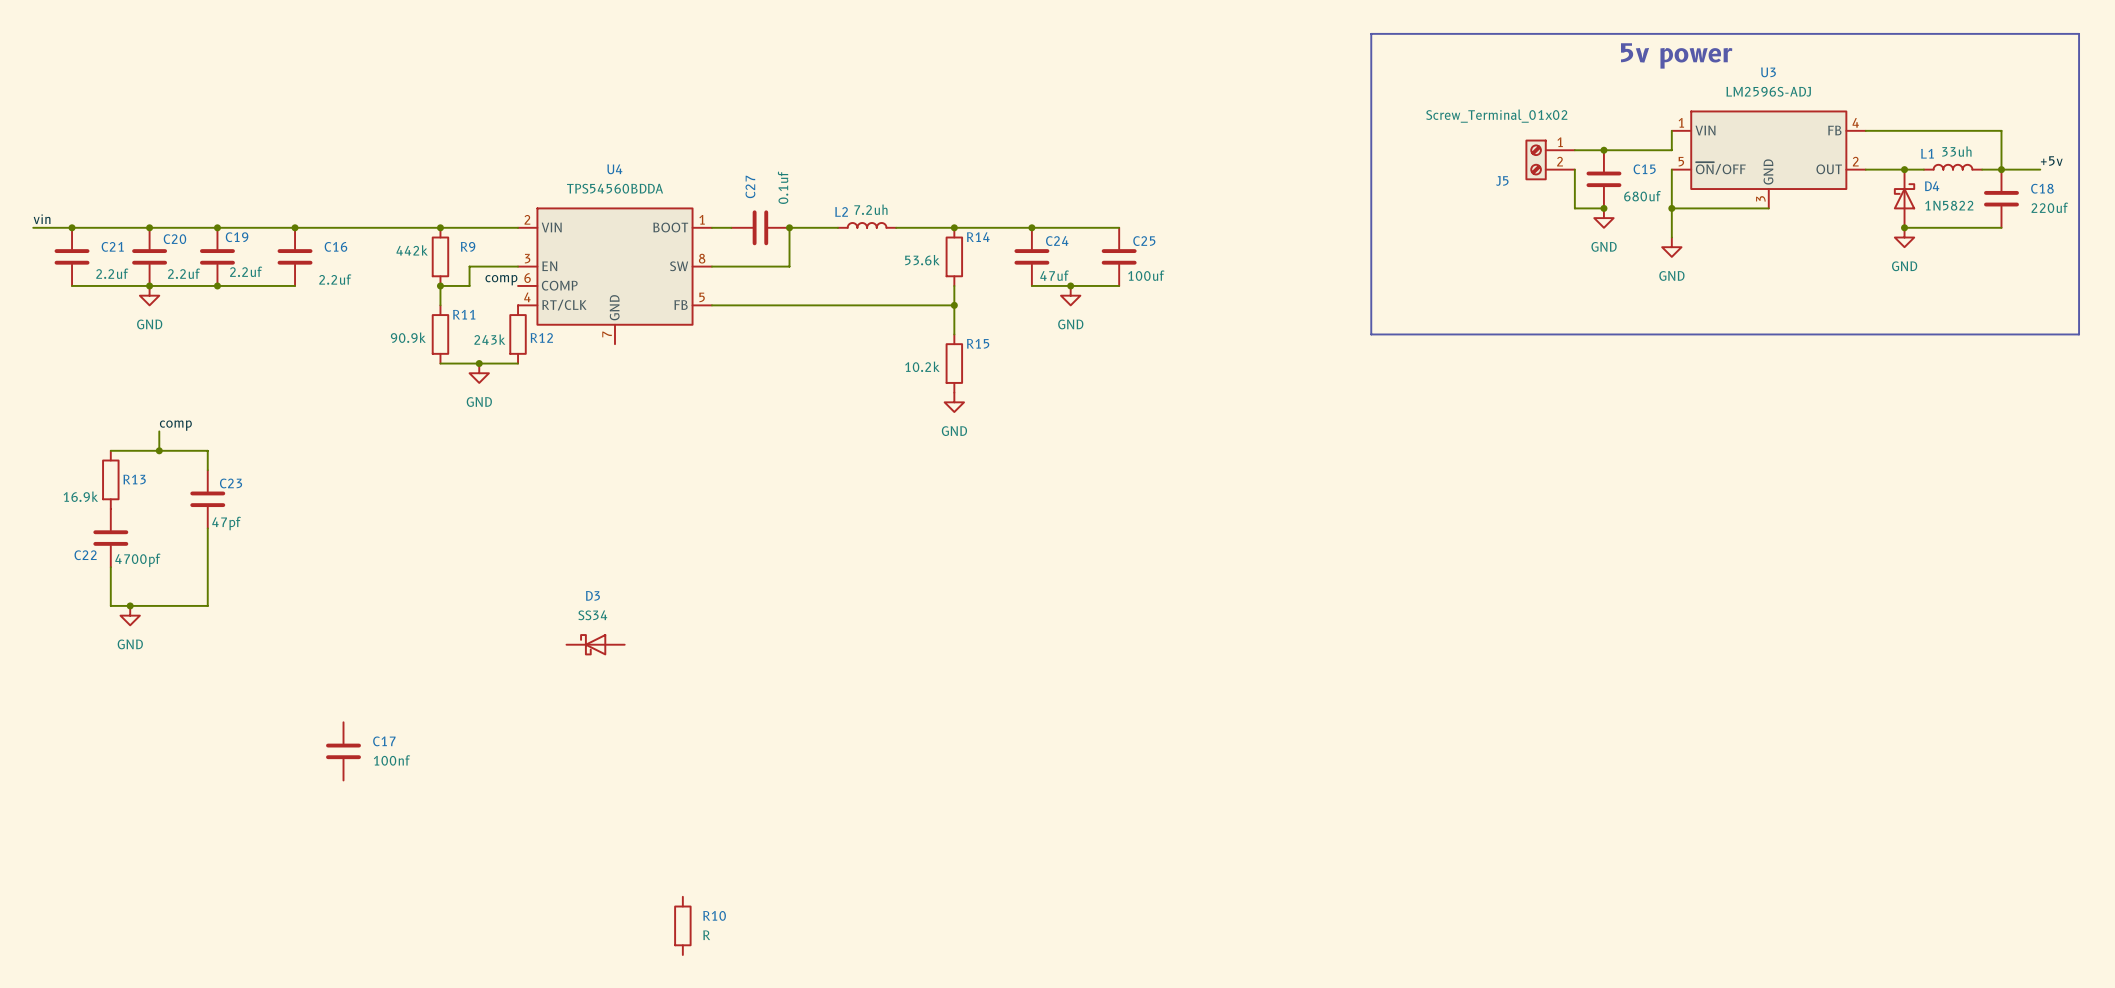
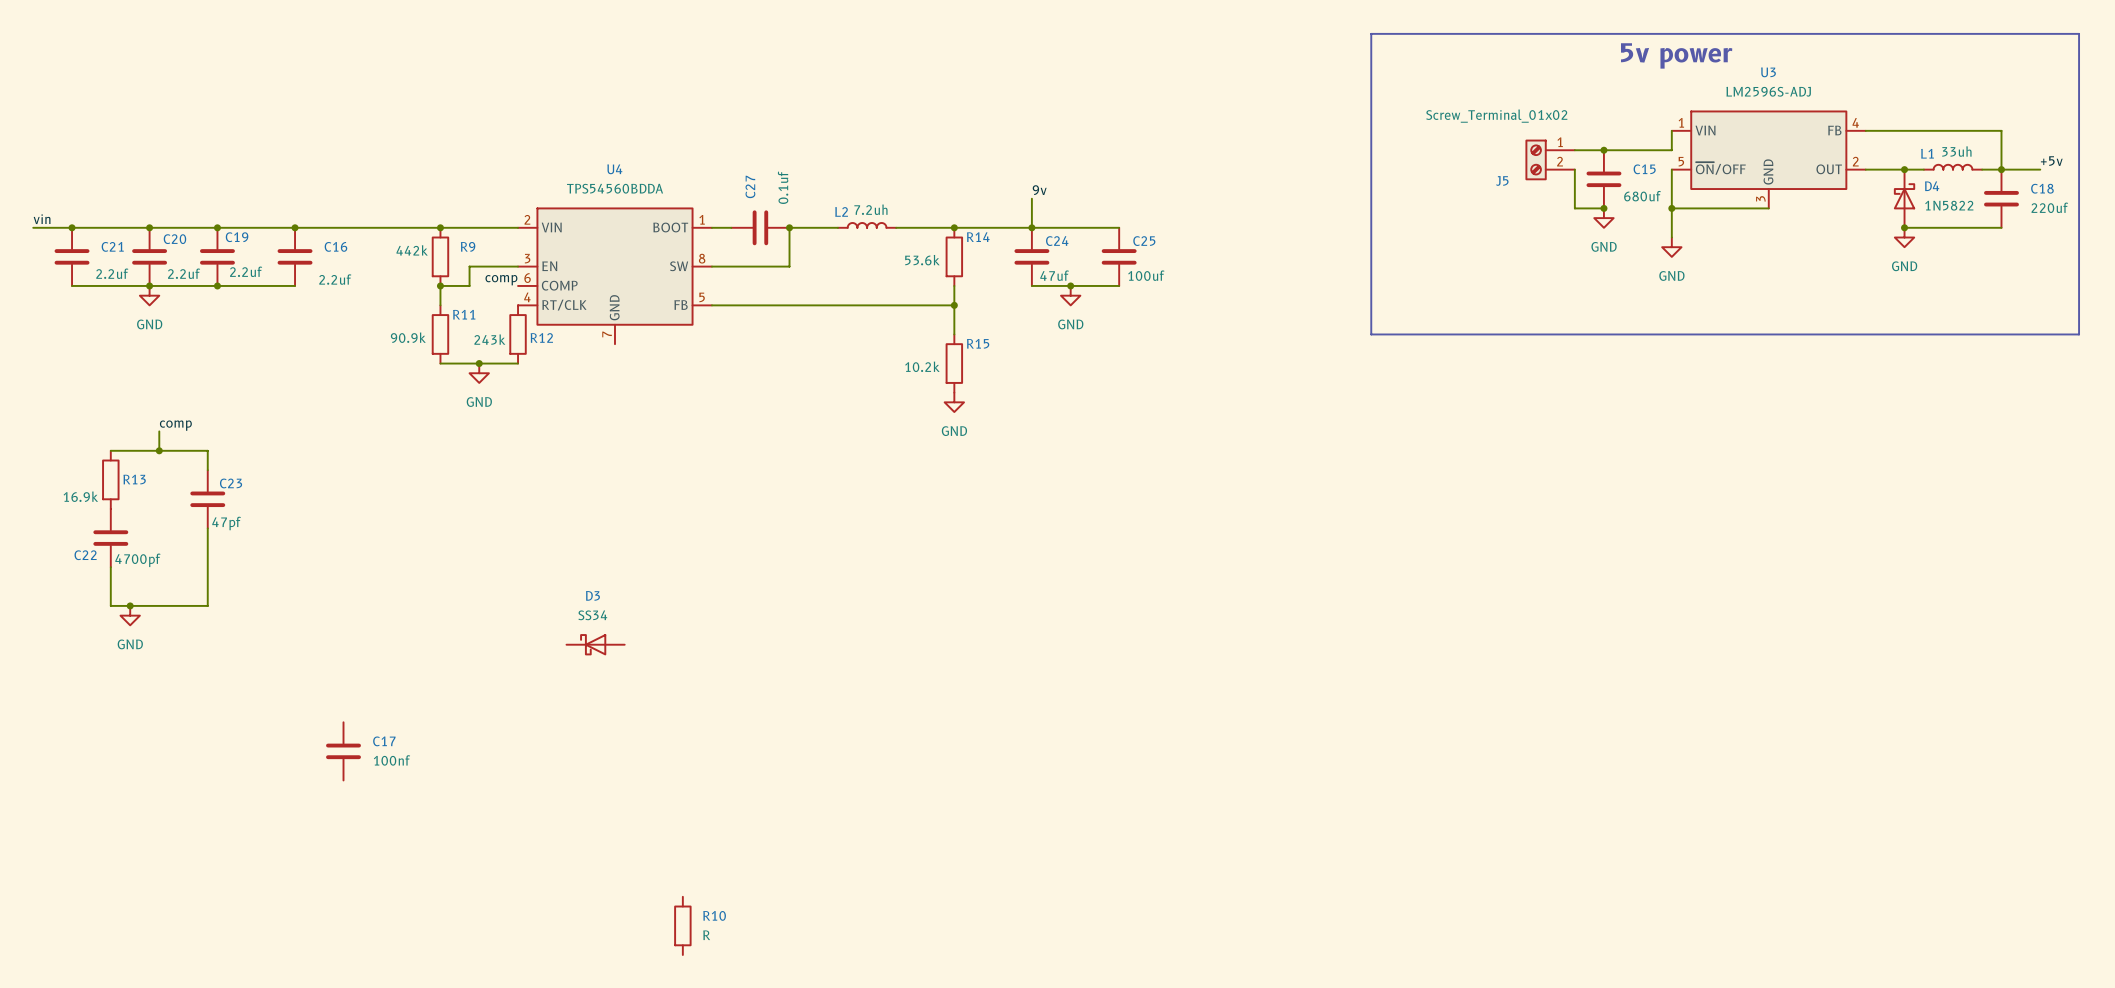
label: none -> 9v (1039, 190)
wire: none -> (1031, 198) (1031, 227)

